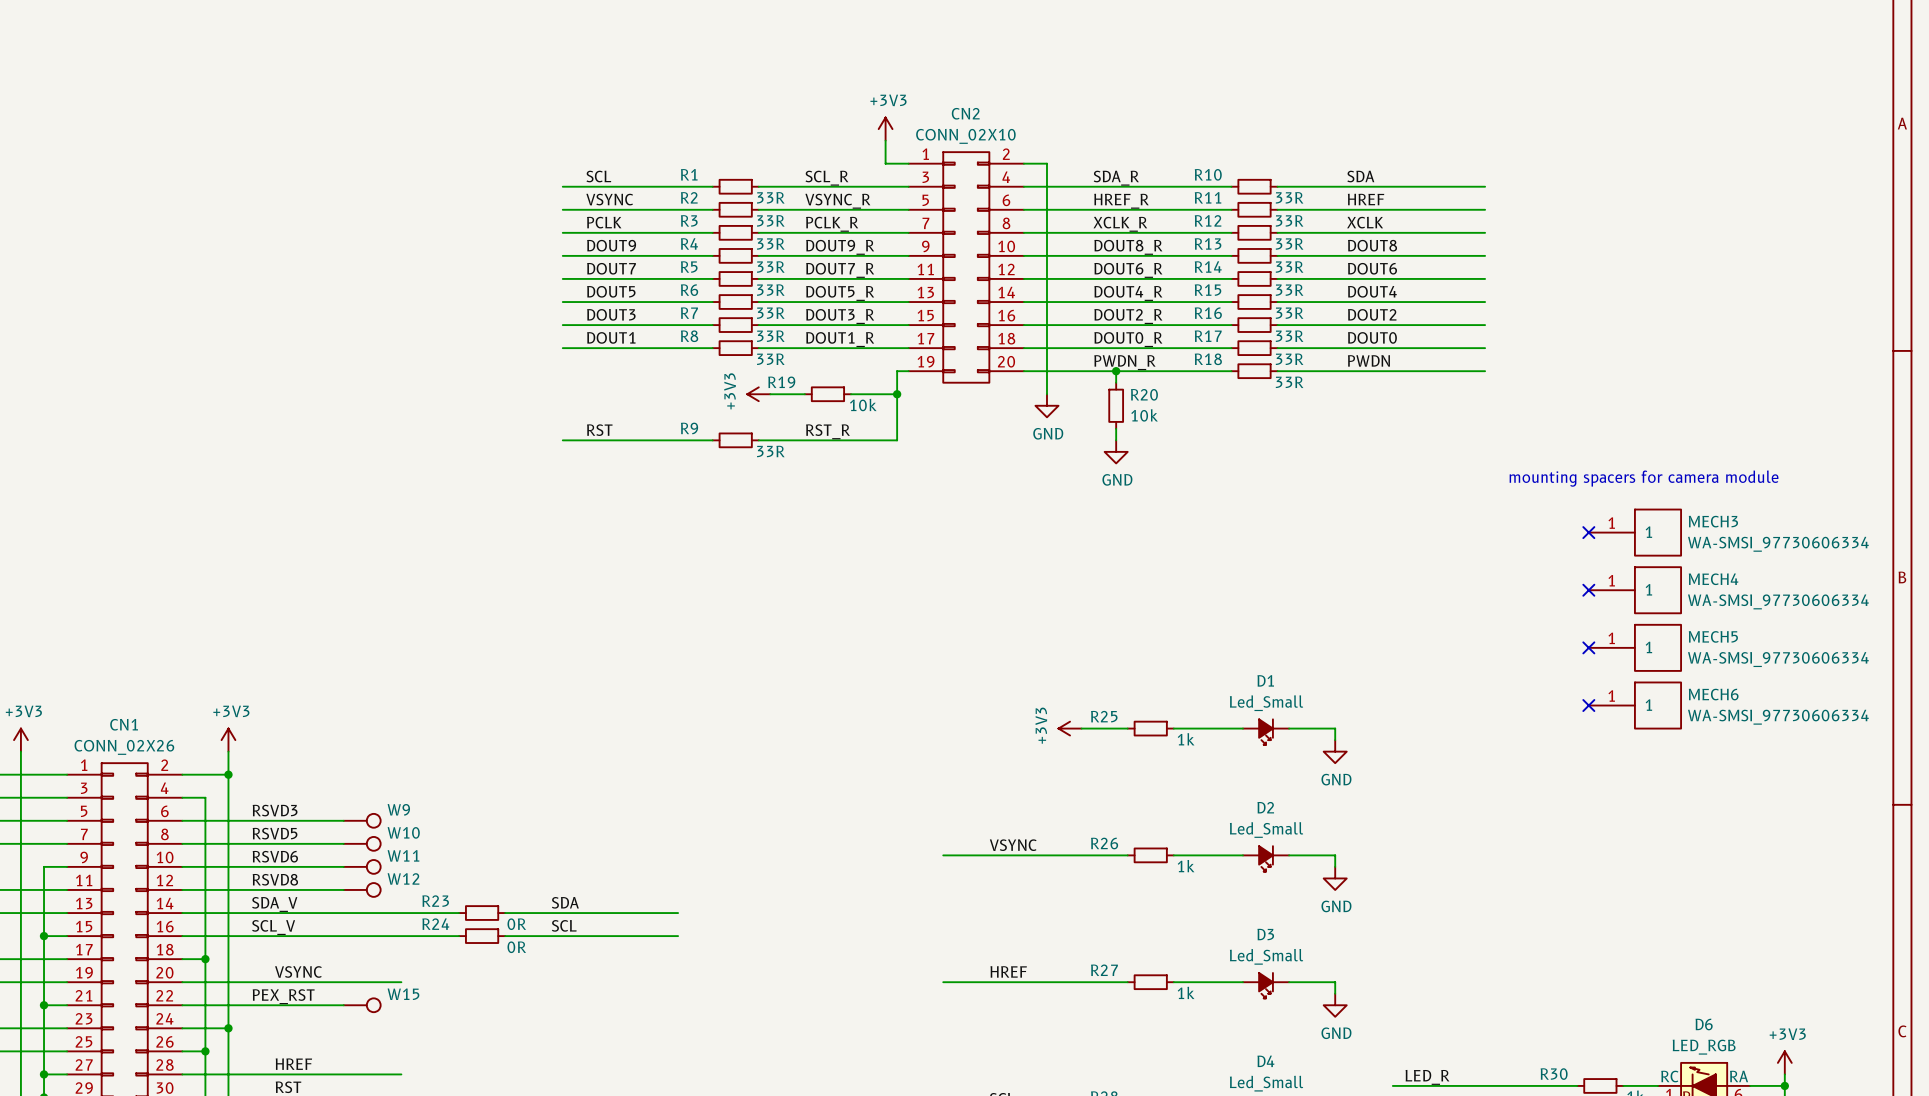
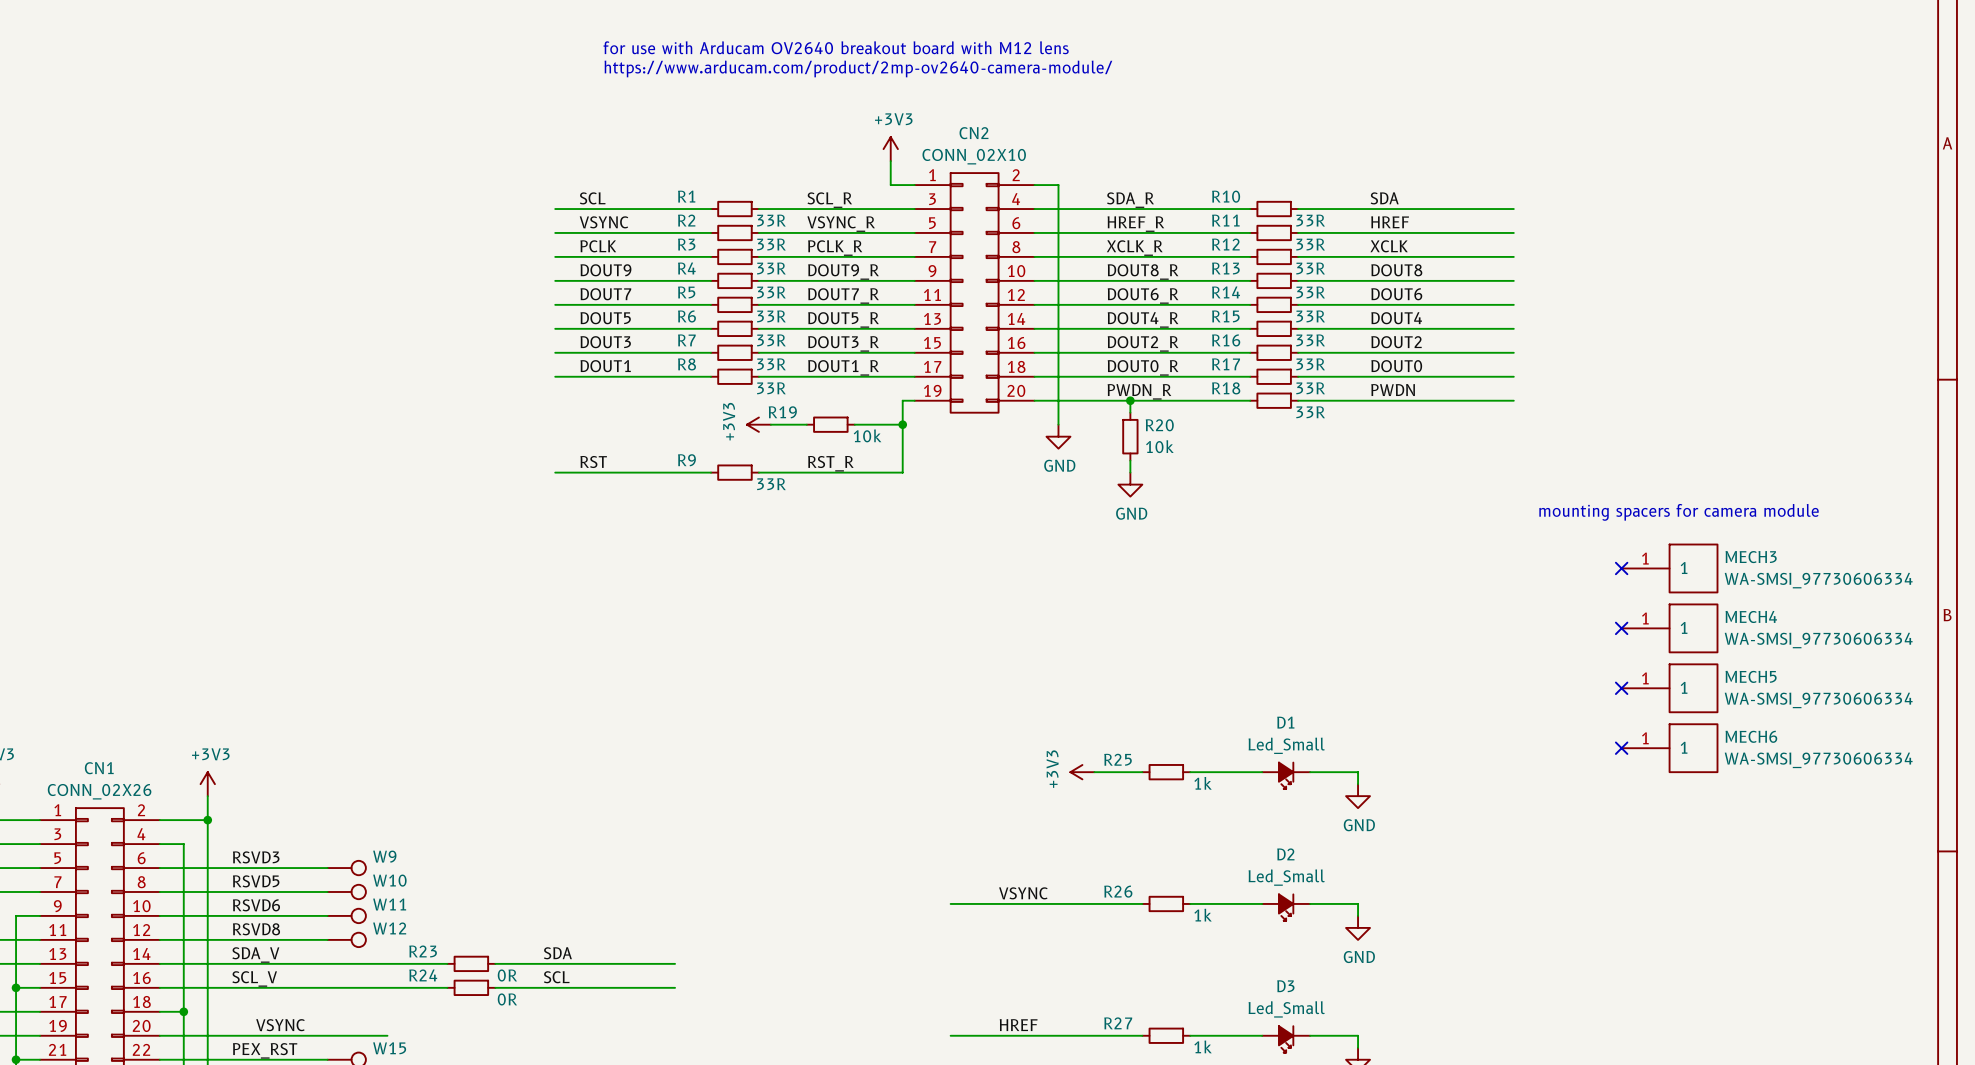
text: none -> for use with Arducam OV2640 breakout board with M12 lens (836, 47)
text: none -> https://www.arducam.com/product/2mp-ov2640-camera-module/ (858, 68)

